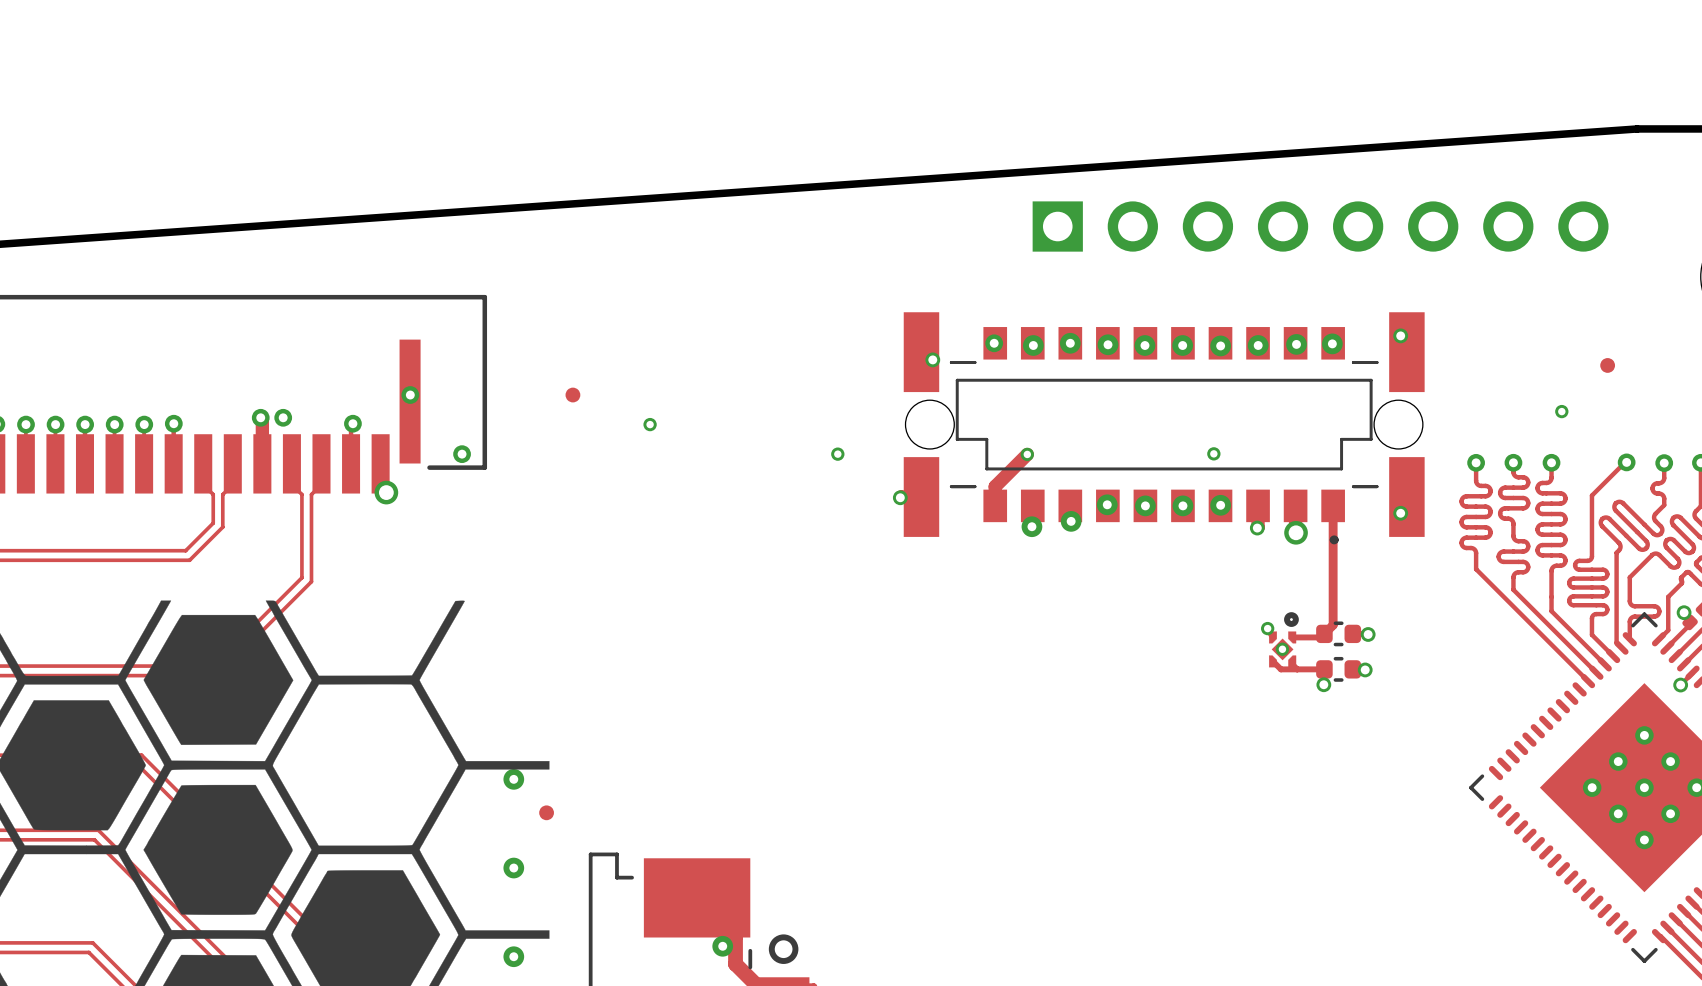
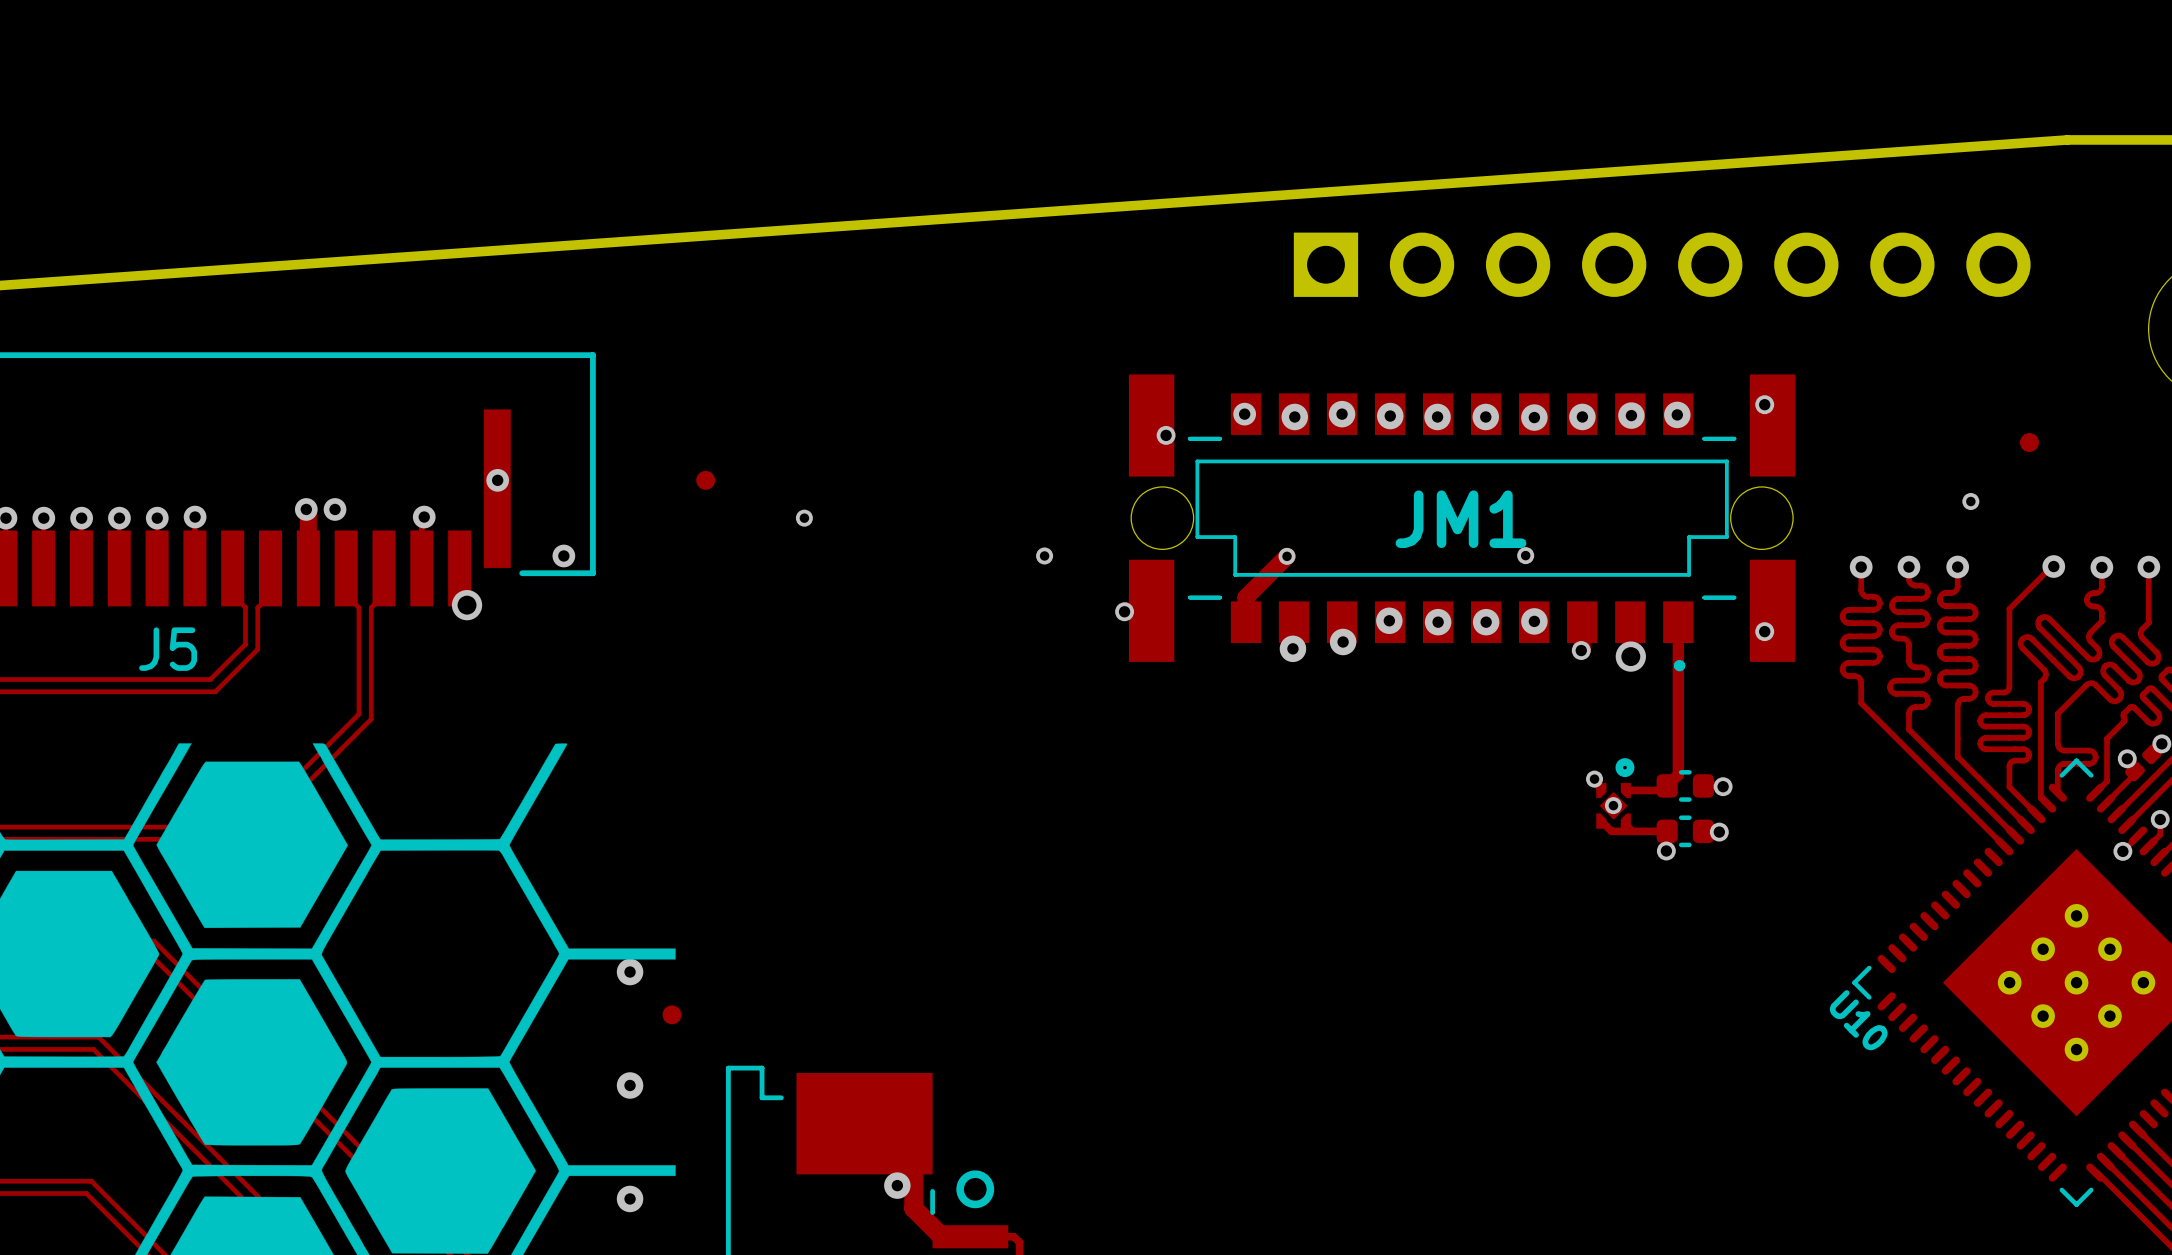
JM1 name: none -> JM1 (1460, 519)
J5 name: none -> J5 (168, 649)
U10 name: none -> U10 (1858, 1020)

